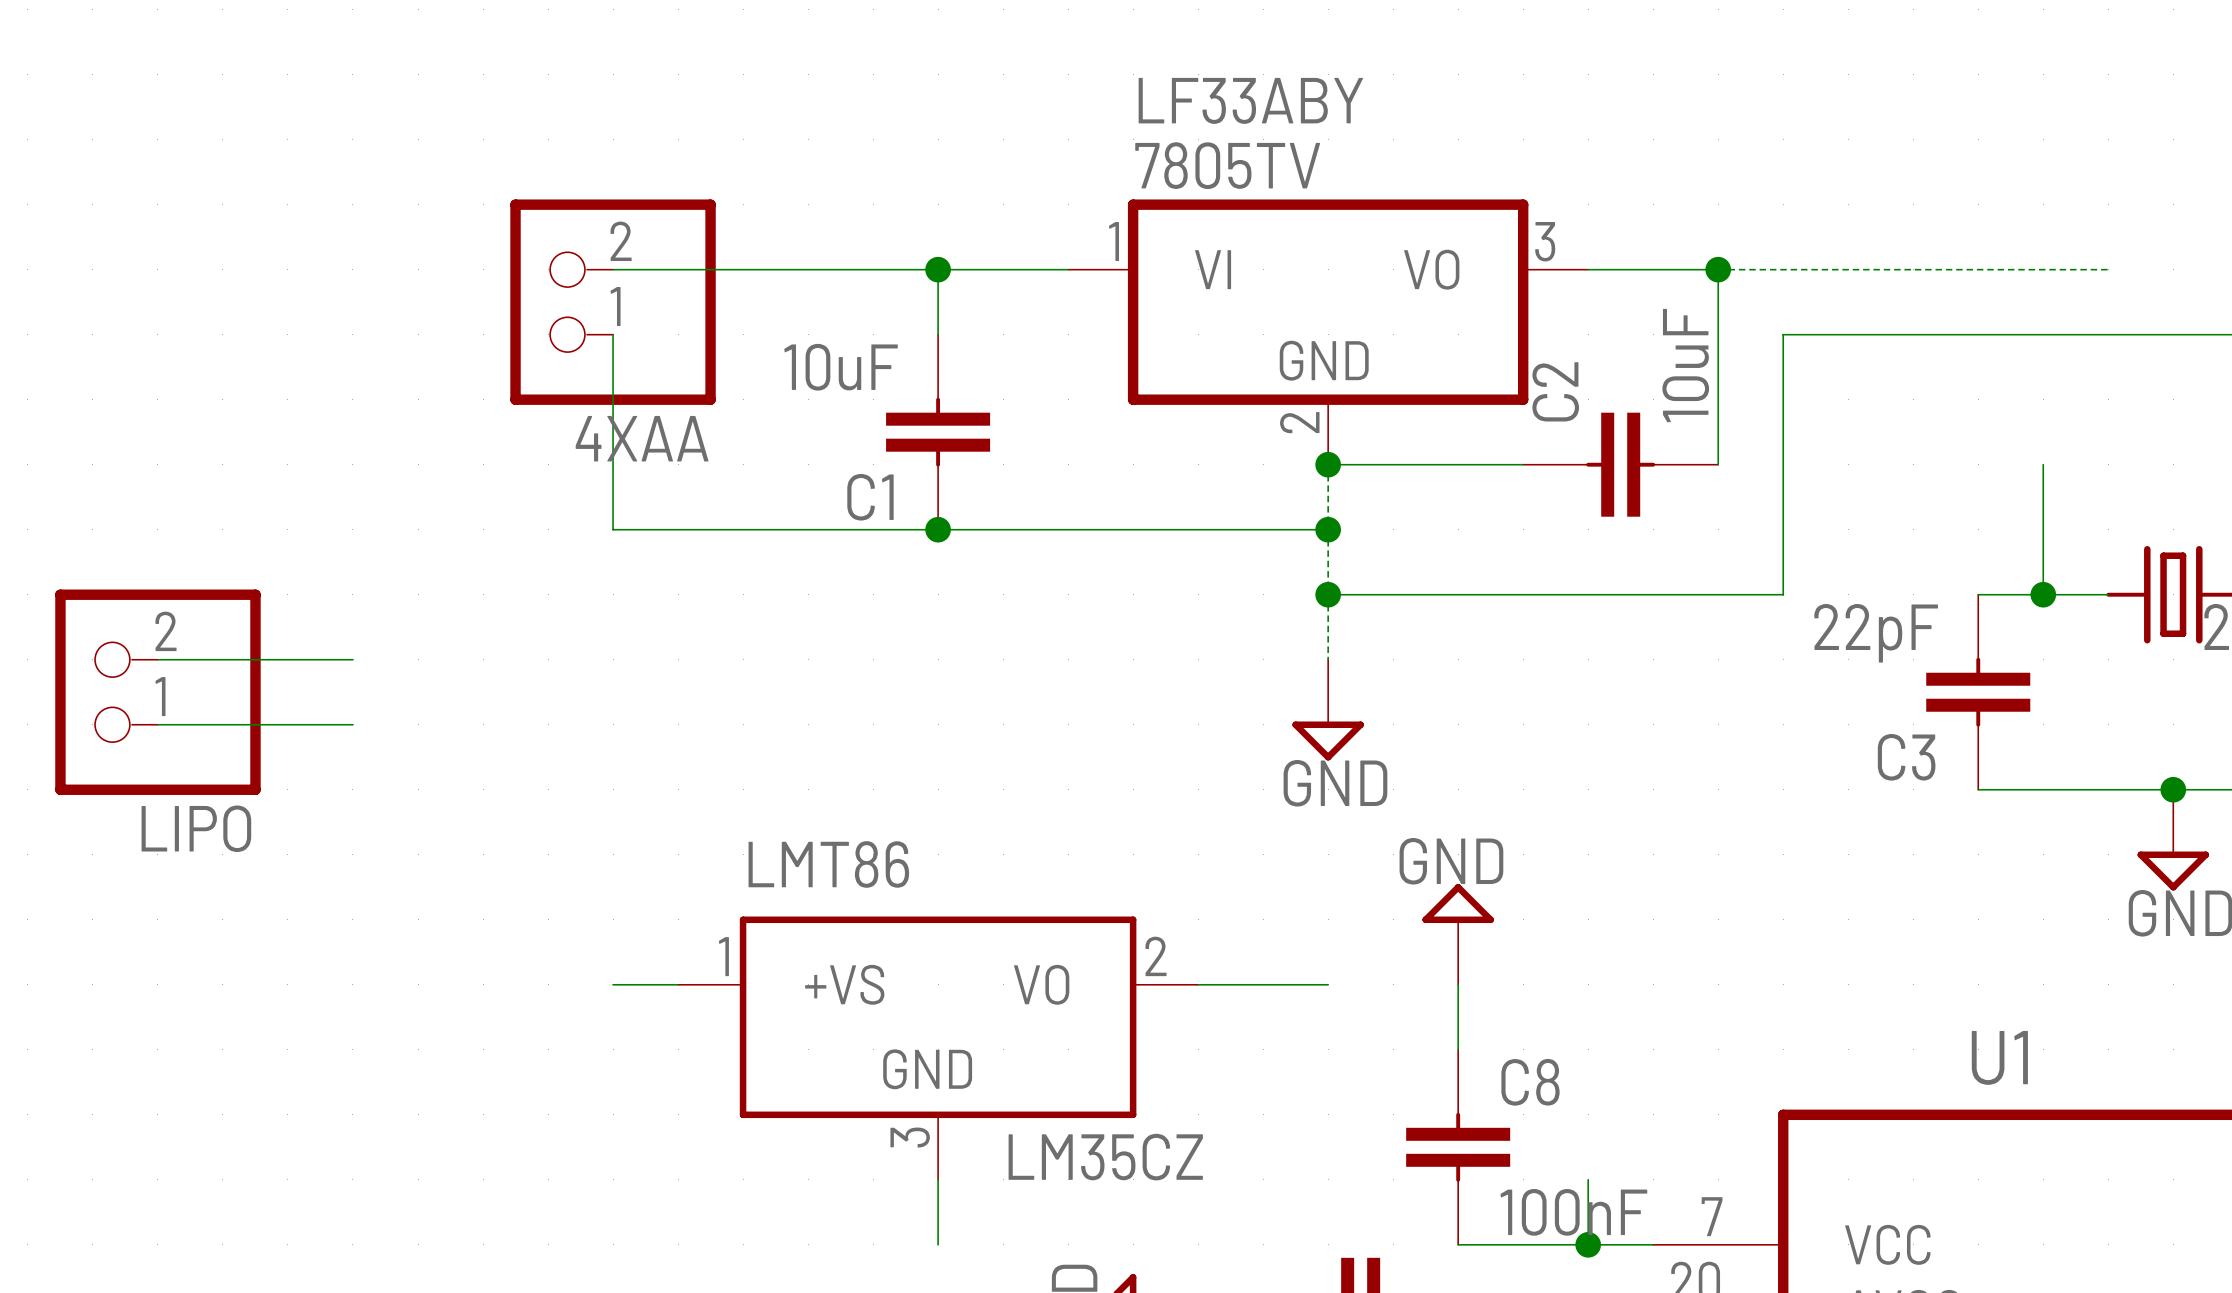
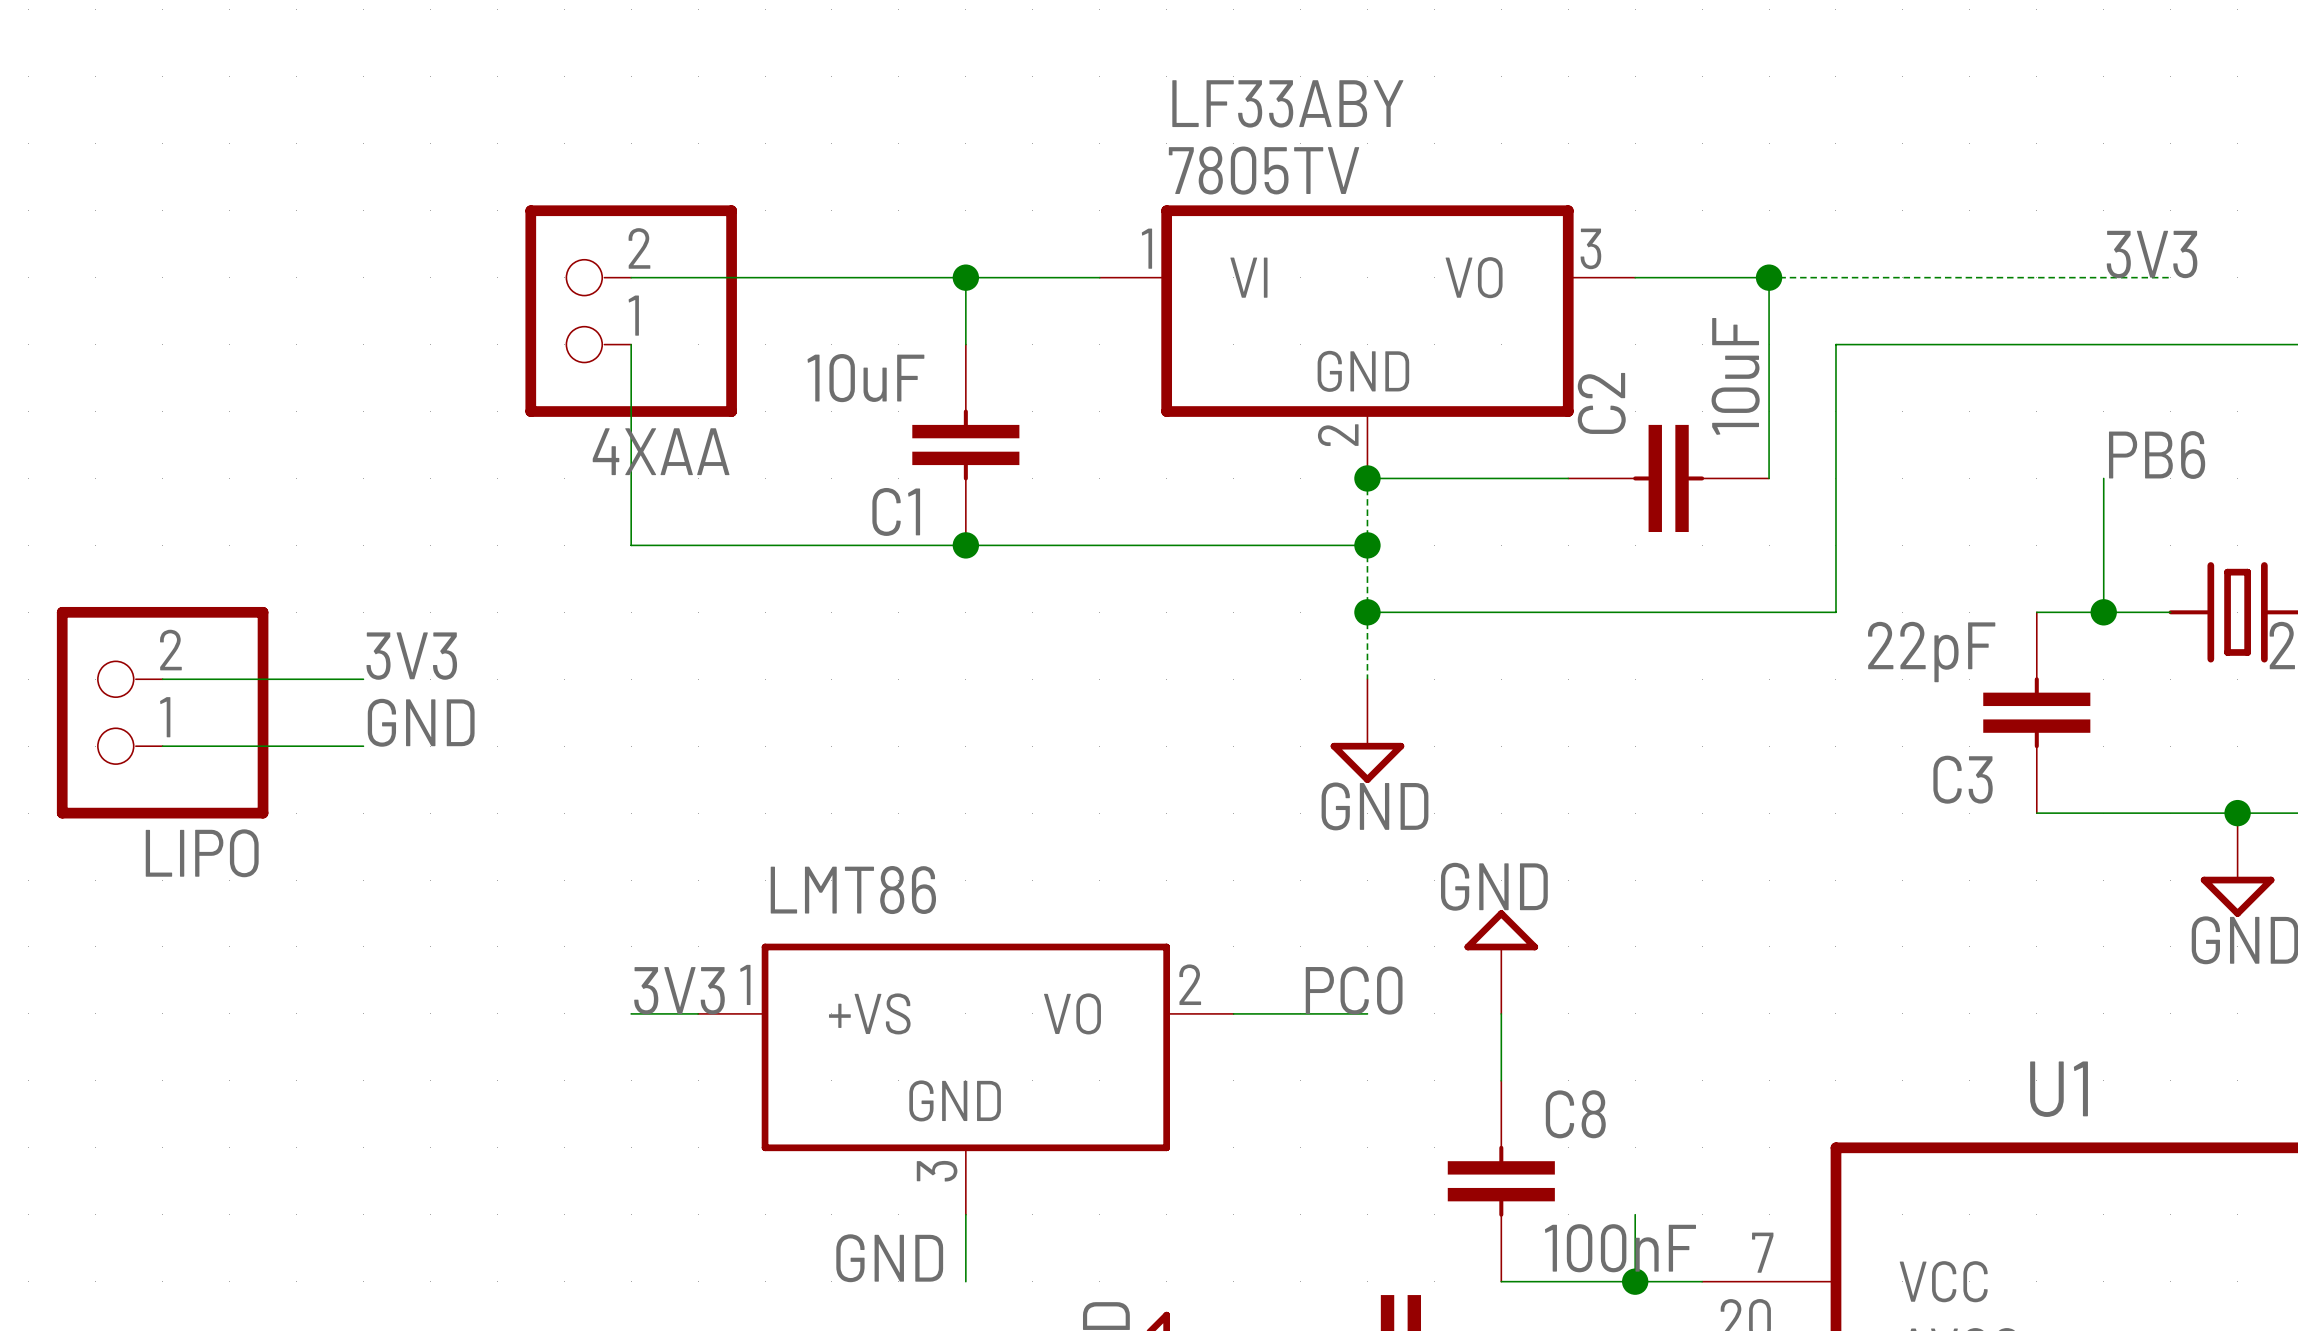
label: none -> 3V3 (2152, 254)
label: none -> PB6 (2157, 455)
label: none -> 3V3 (411, 656)
label: none -> GND (421, 722)
label: none -> 3V3 (679, 990)
label: none -> PC0 (1354, 990)
LMT86 value: LM35CZ (1105, 1157) -> none
label: none -> GND (889, 1258)

